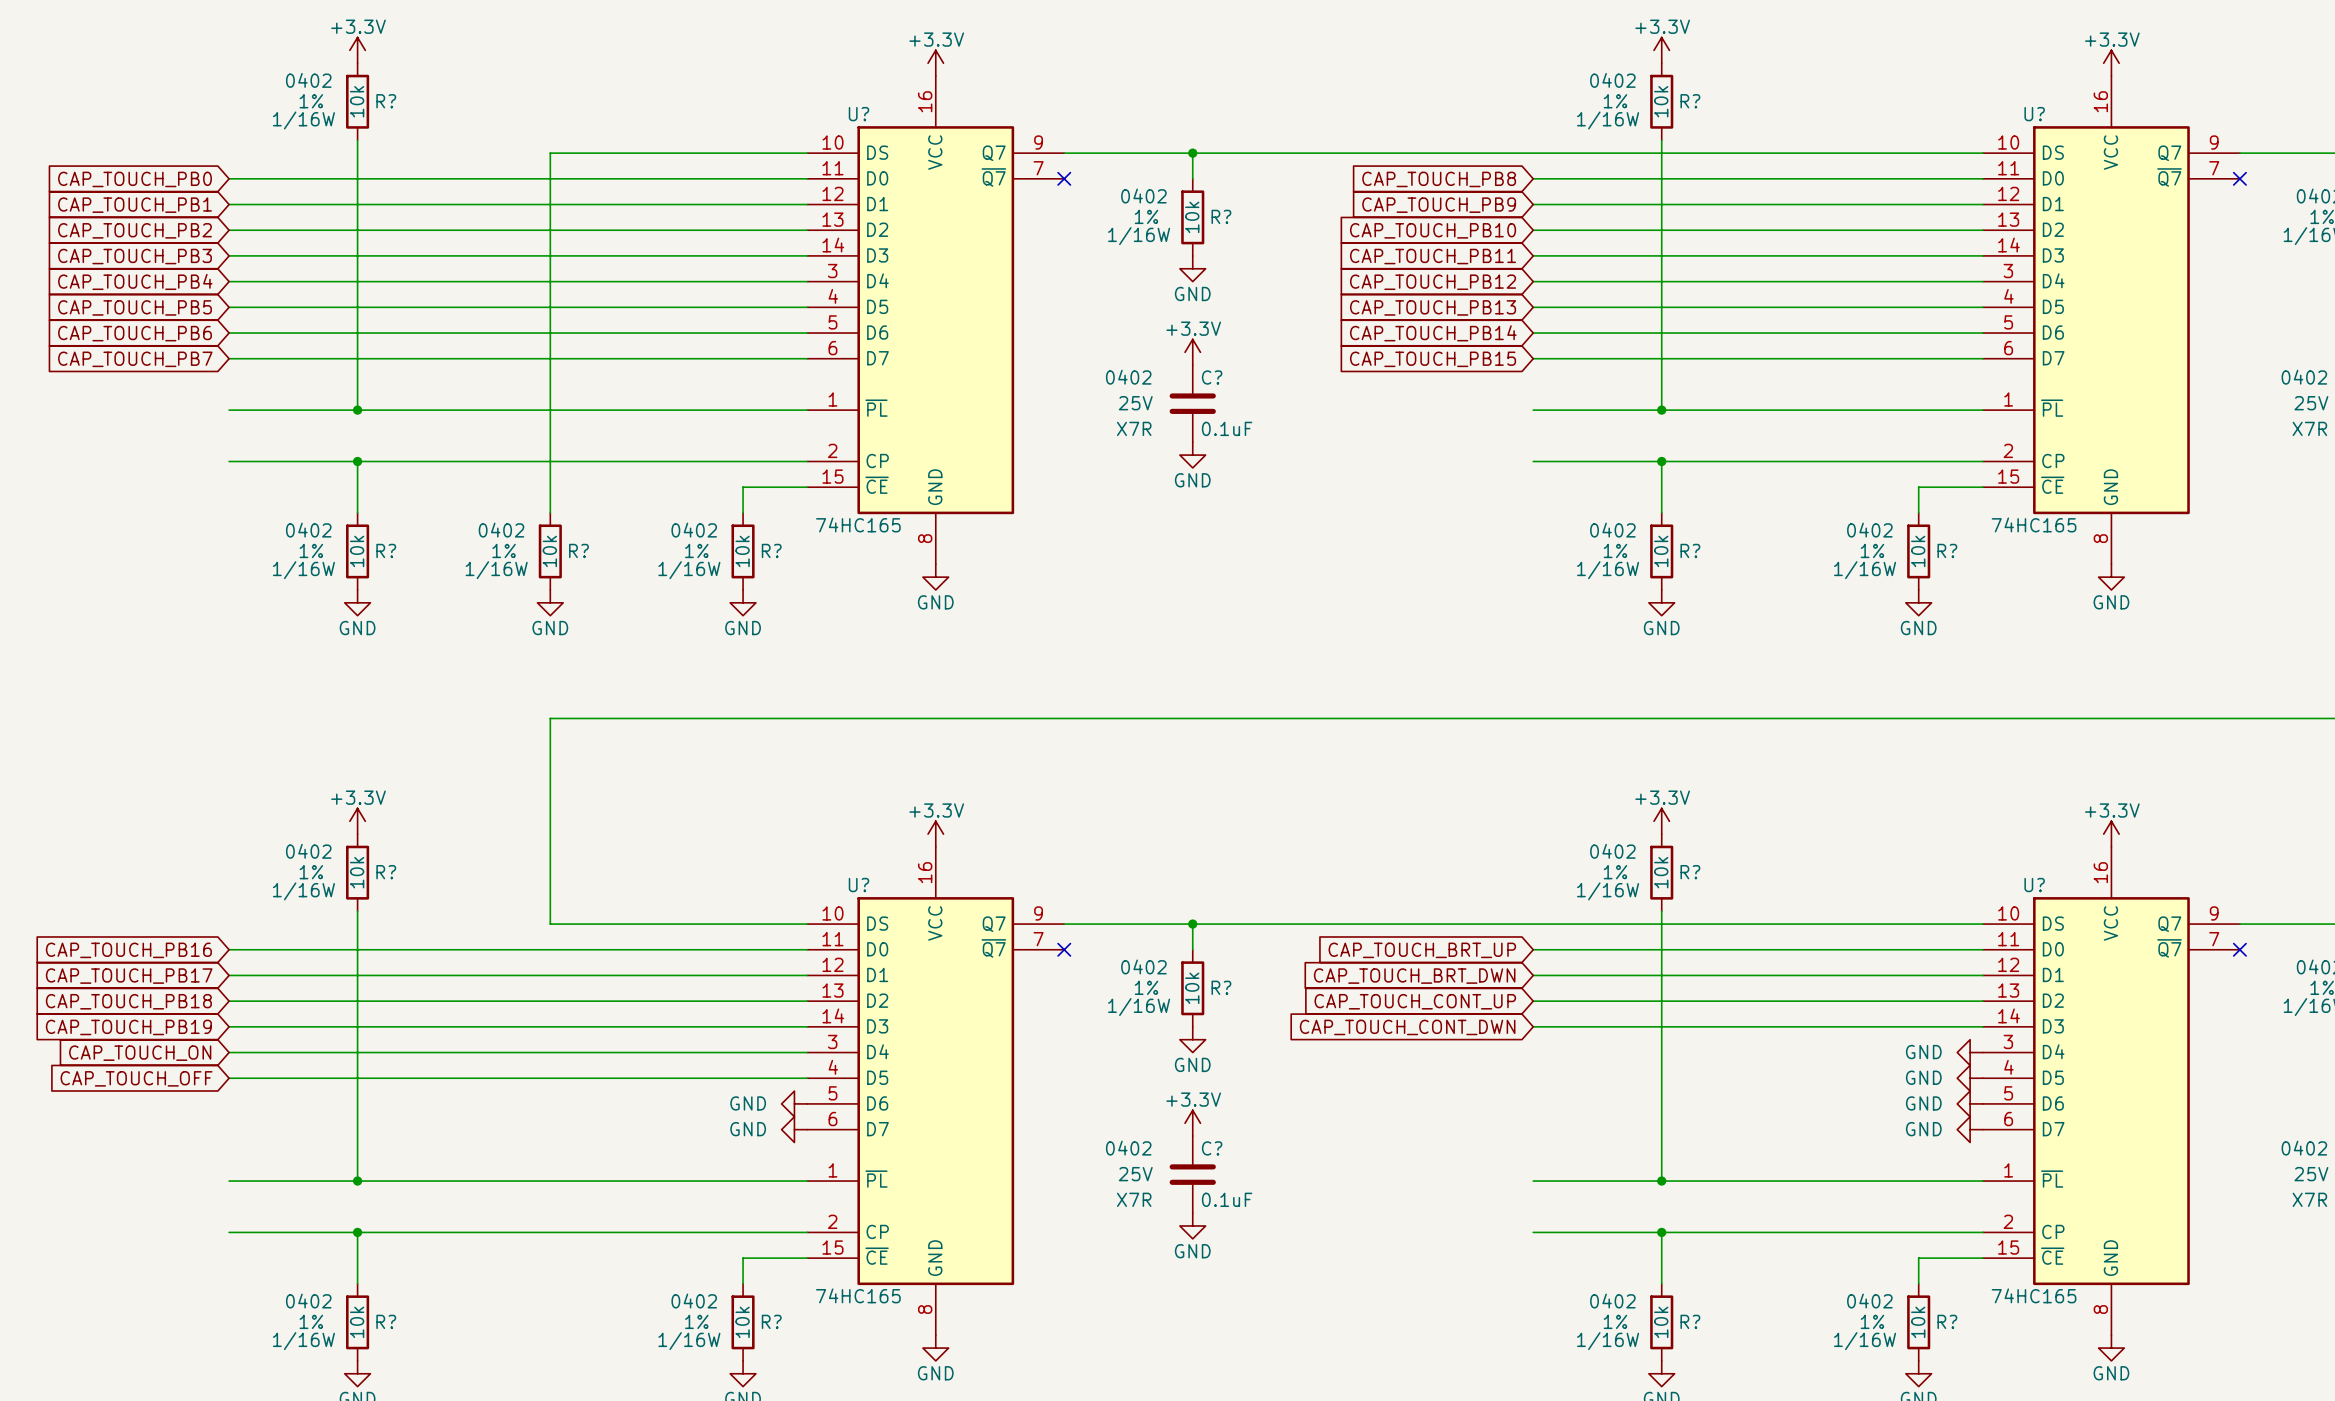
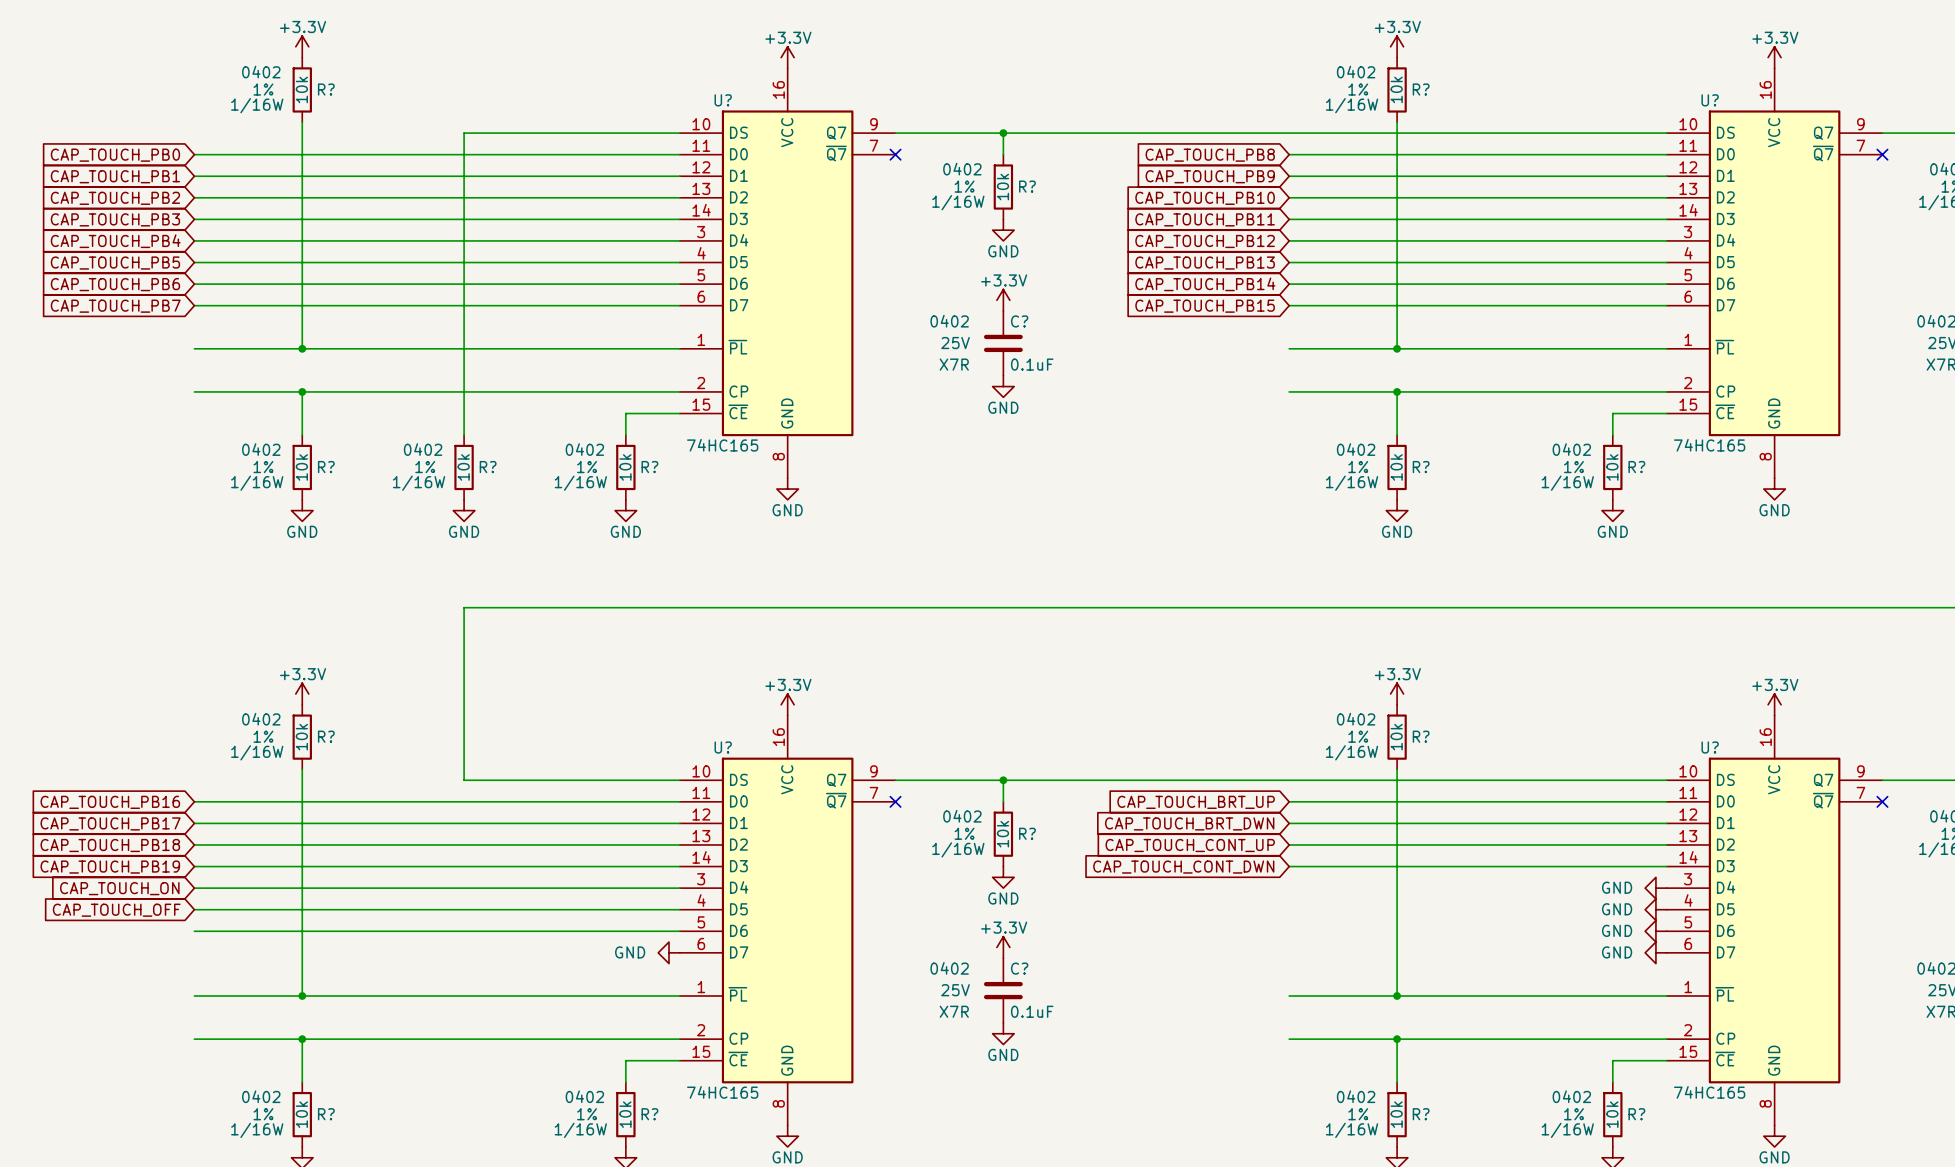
wire: none -> (194, 931) (679, 931)
power symbol: GND (794, 1103) -> none

